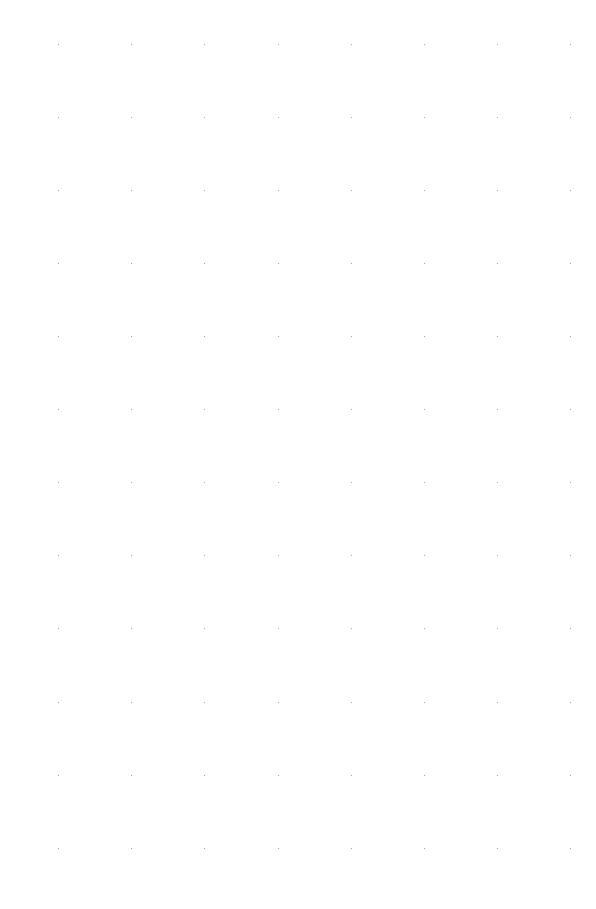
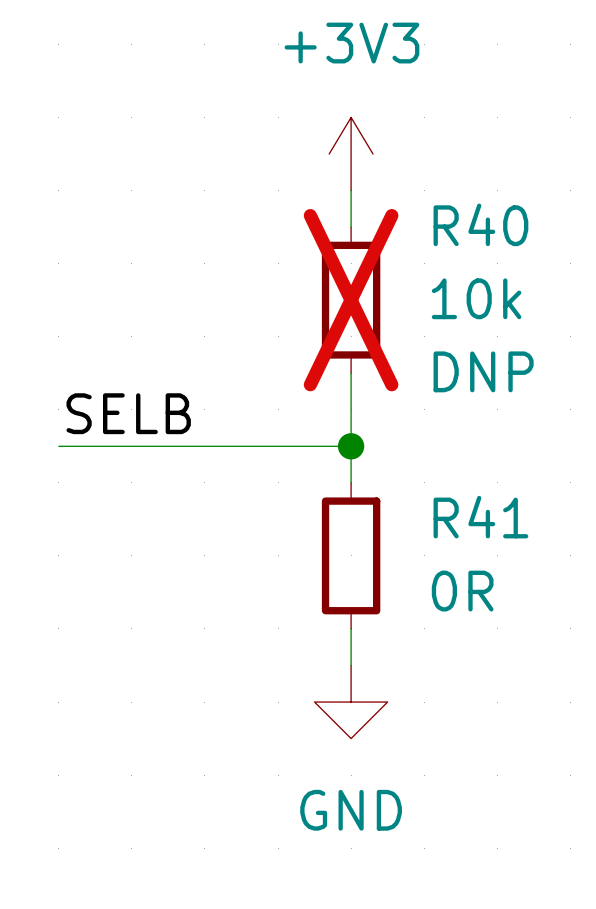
power symbol: none -> +3V3 (351, 154)
wire: none -> (351, 190) (351, 227)
R40: none -> (351, 300)
wire: none -> (351, 373) (351, 482)
label: none -> SELB (128, 413)
wire: none -> (58, 446) (351, 446)
junction: none -> (351, 446)
R41: none -> (351, 555)
wire: none -> (351, 628) (351, 665)
power symbol: none -> GND (351, 702)

